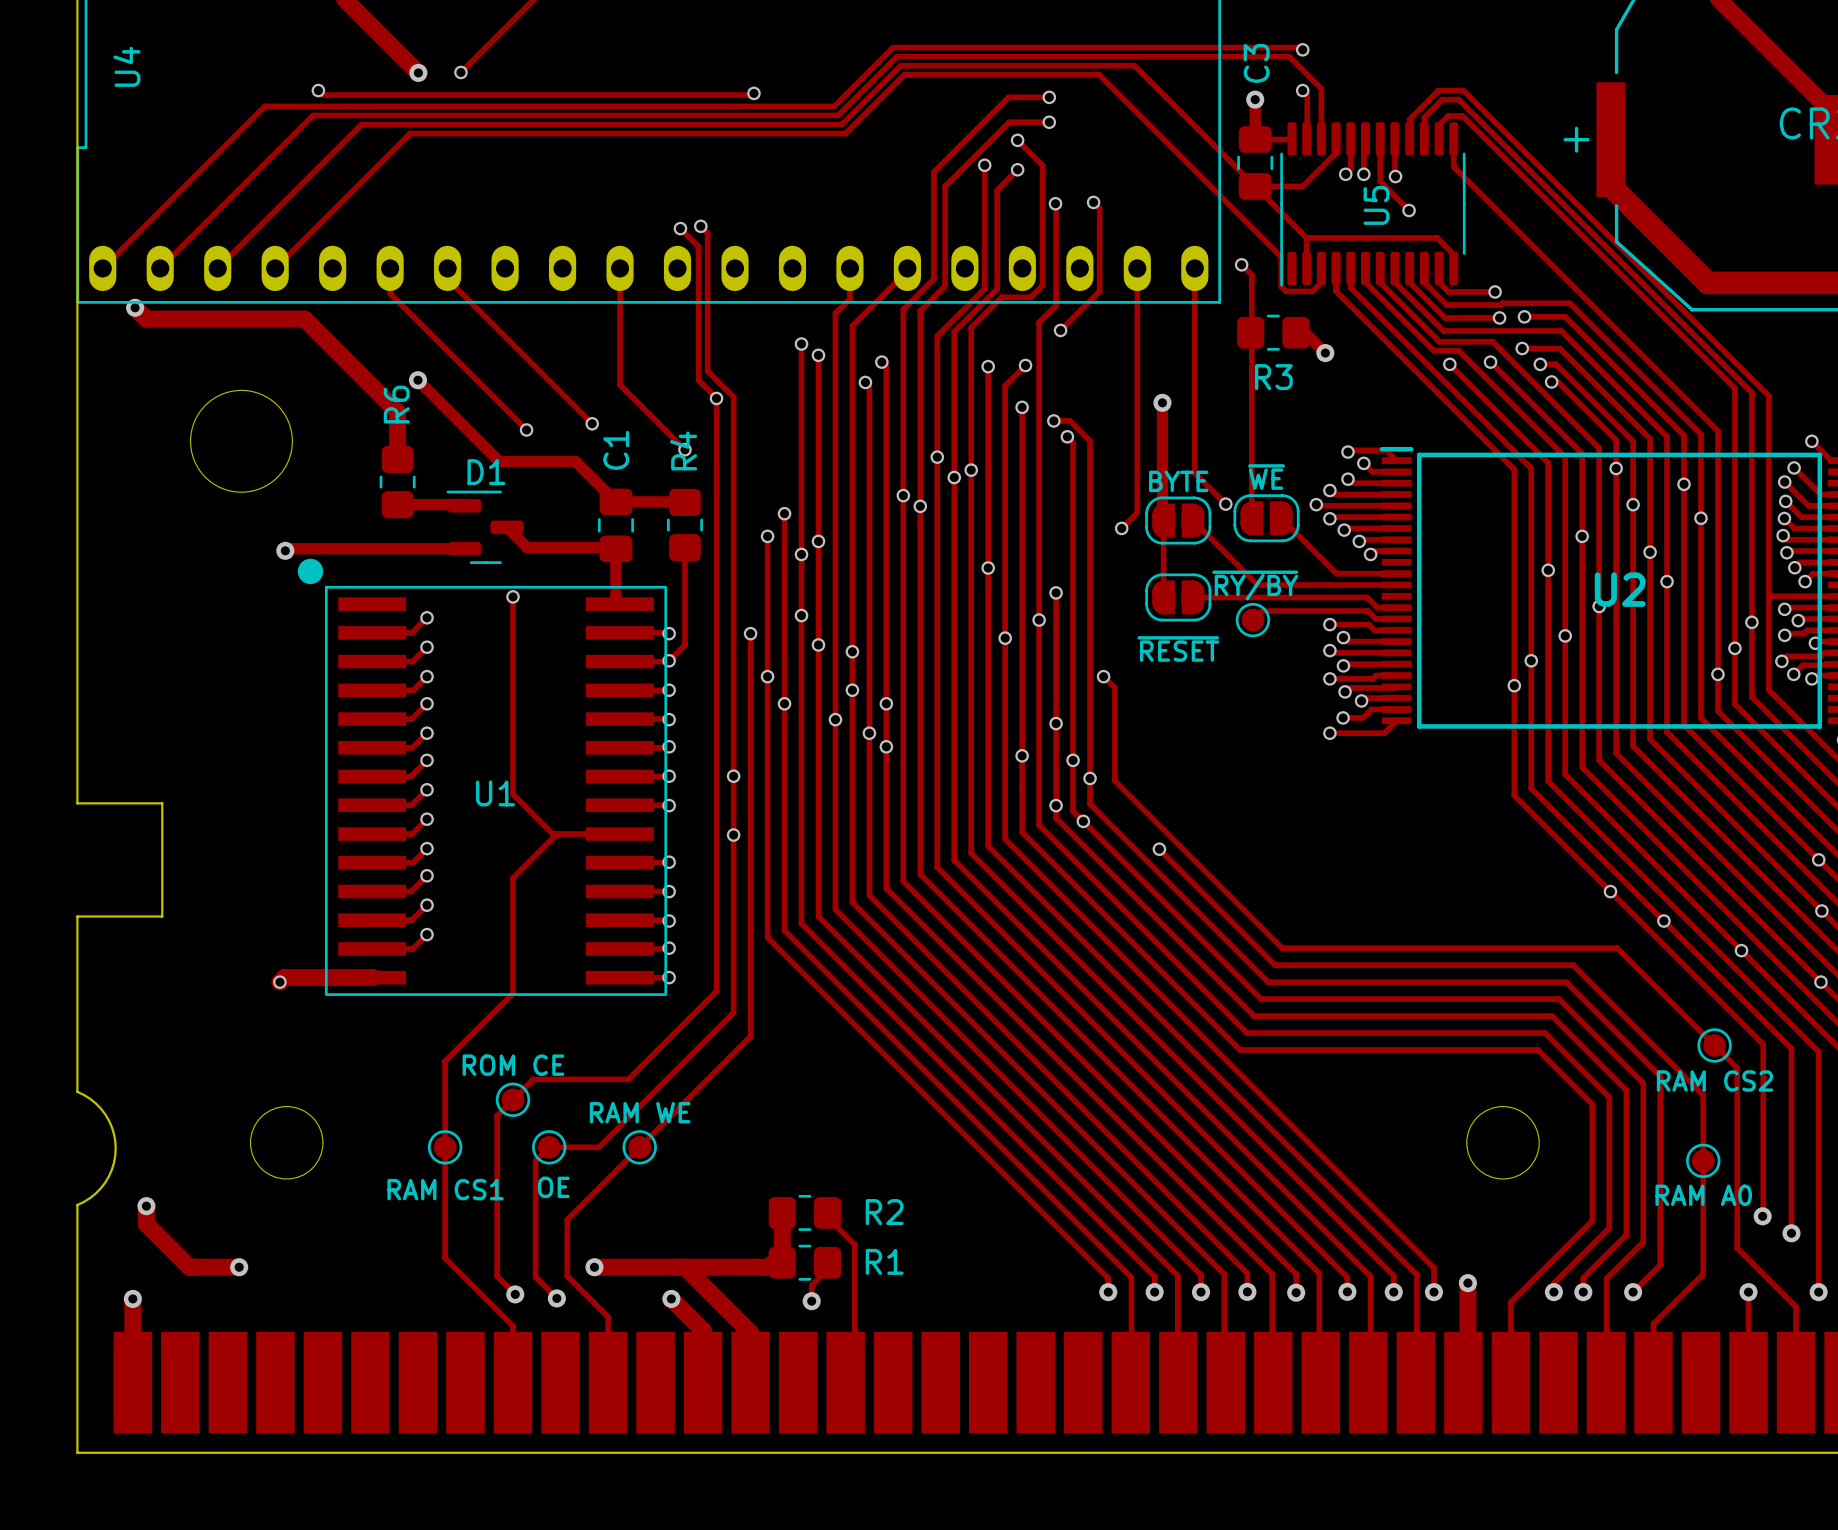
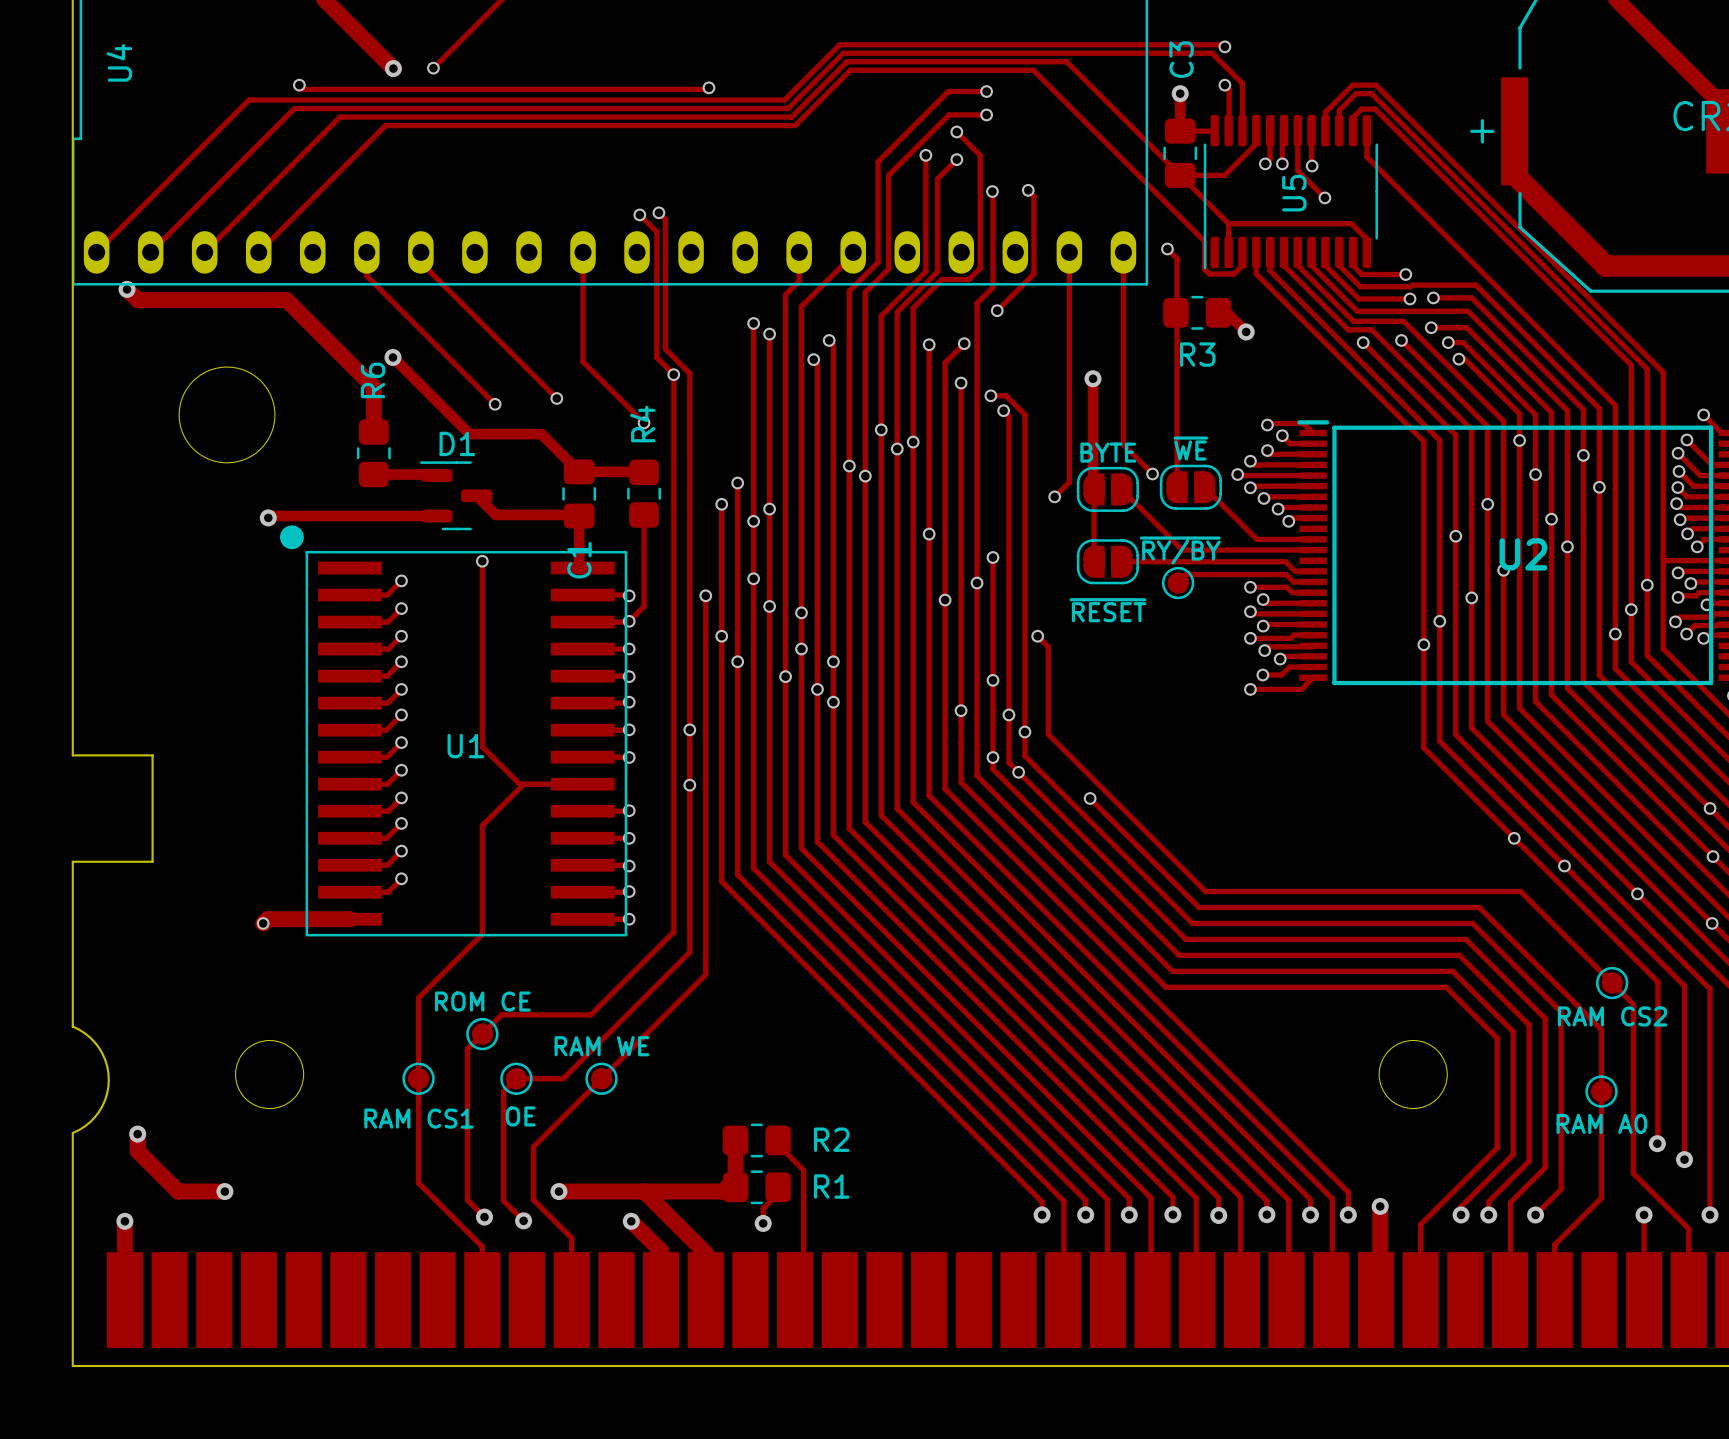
C1 name position: C1 (616, 450) -> C1 (579, 560)

